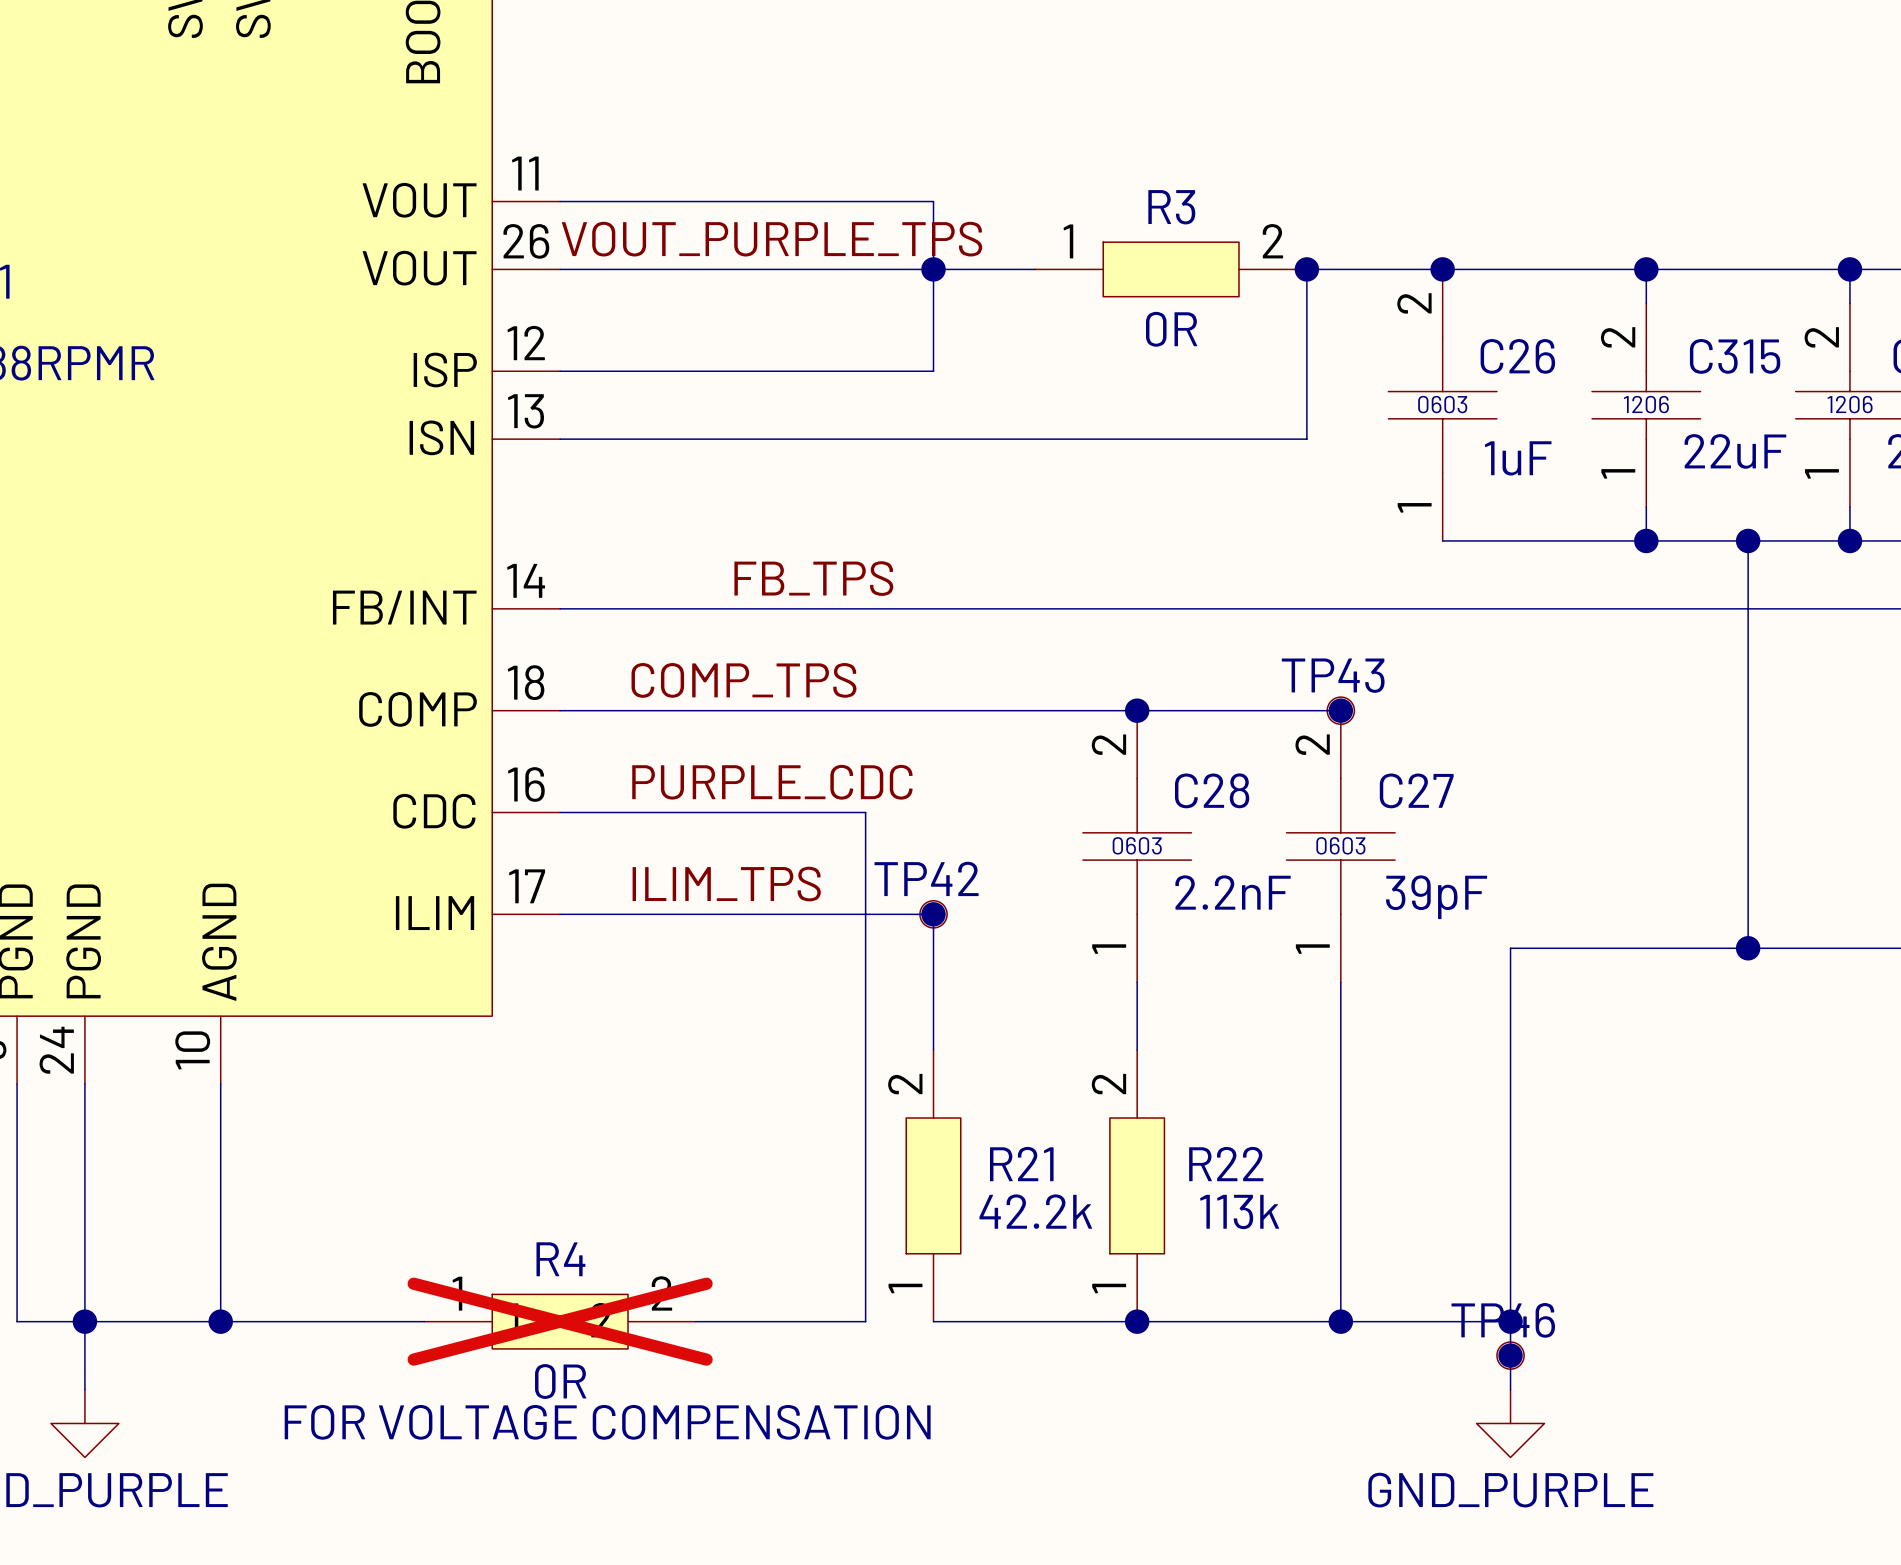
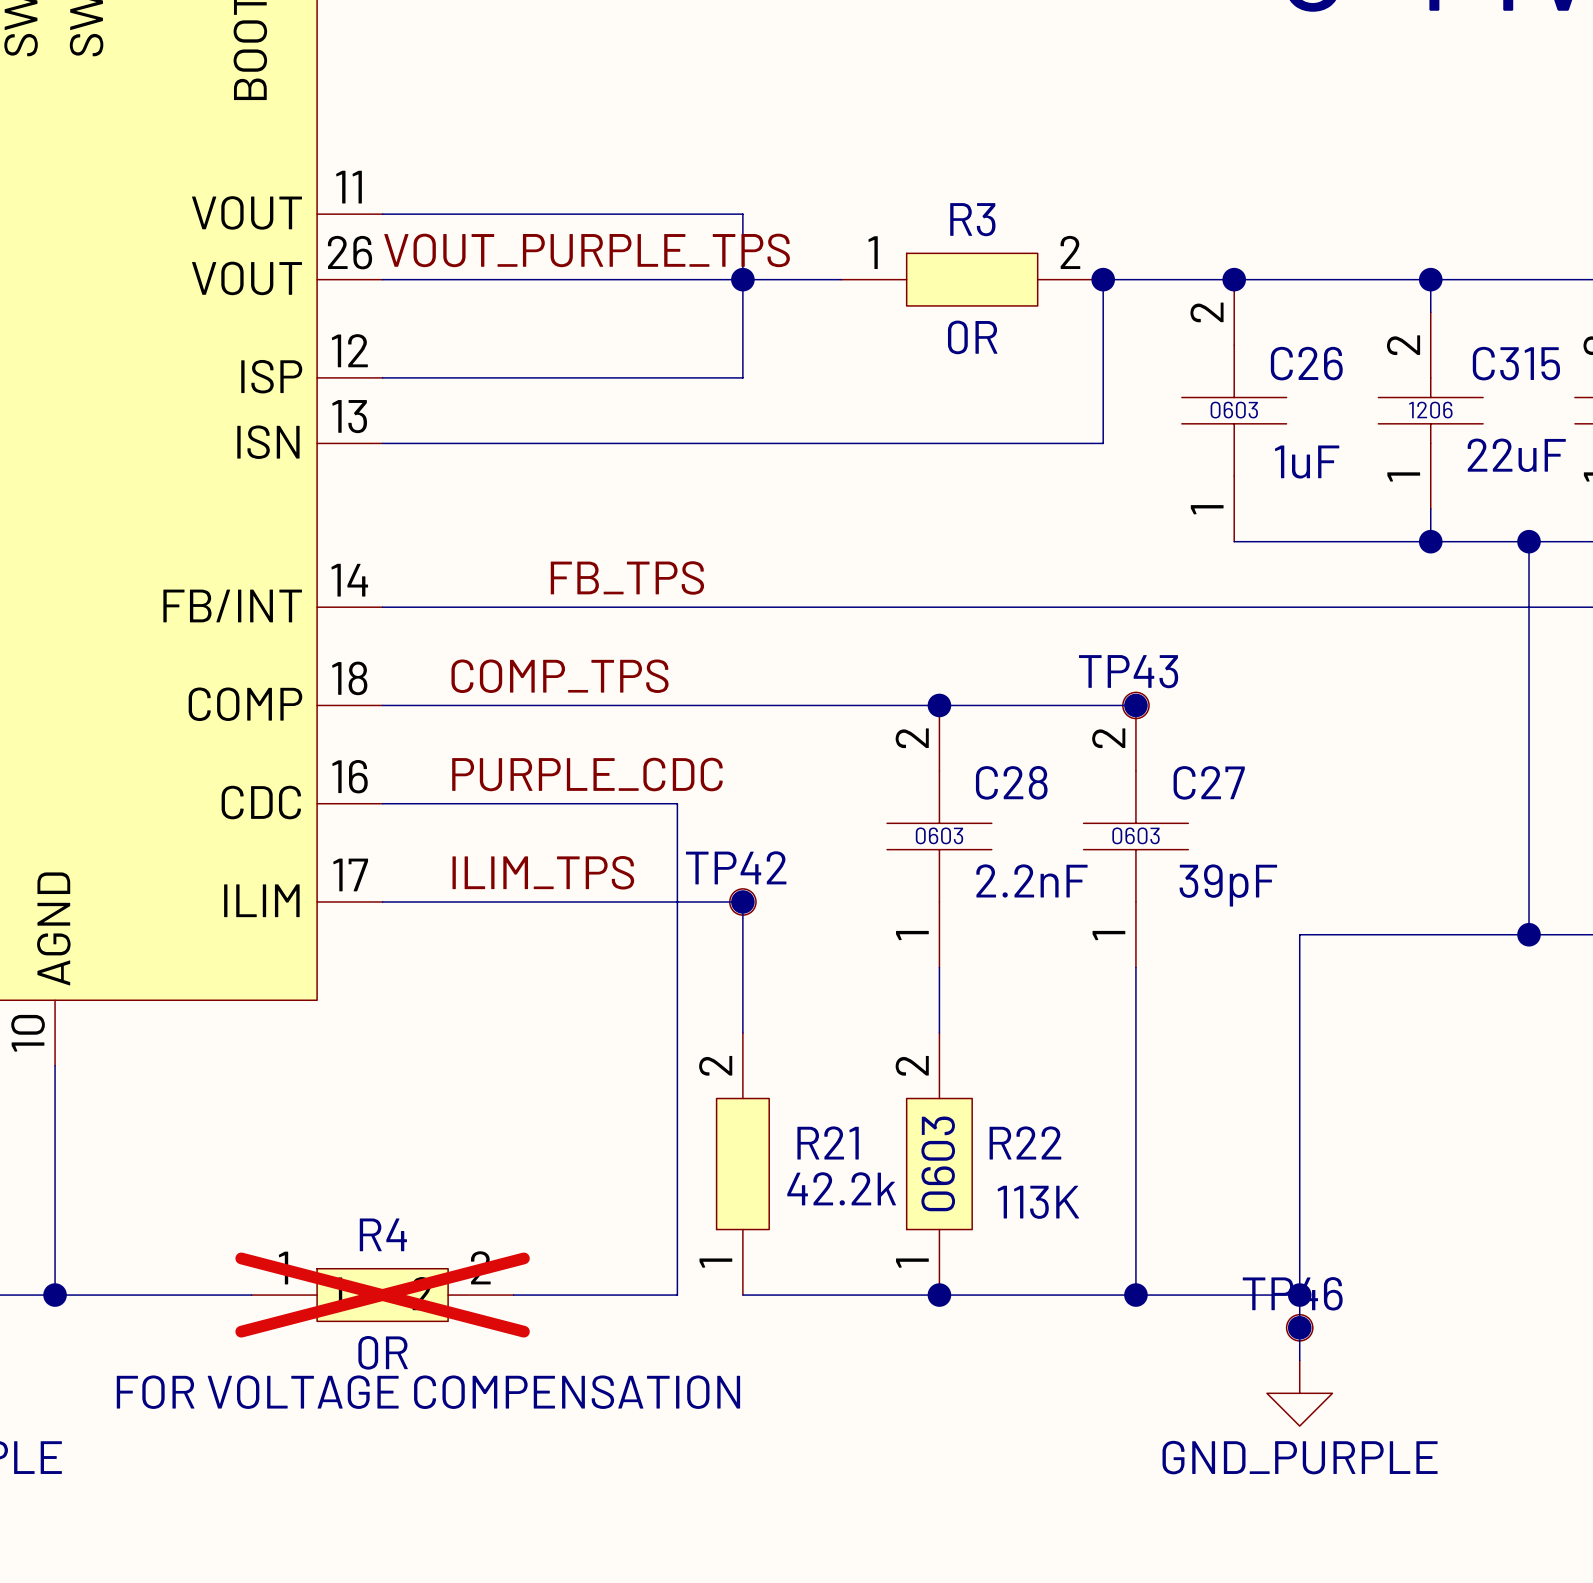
R22 symbol: [1109, 1050, 1165, 1322] -> [906, 1033, 973, 1296]
R22 text: none -> 0603 (938, 1163)
R22 text: 113k (1239, 1211) -> 113K (1038, 1202)

